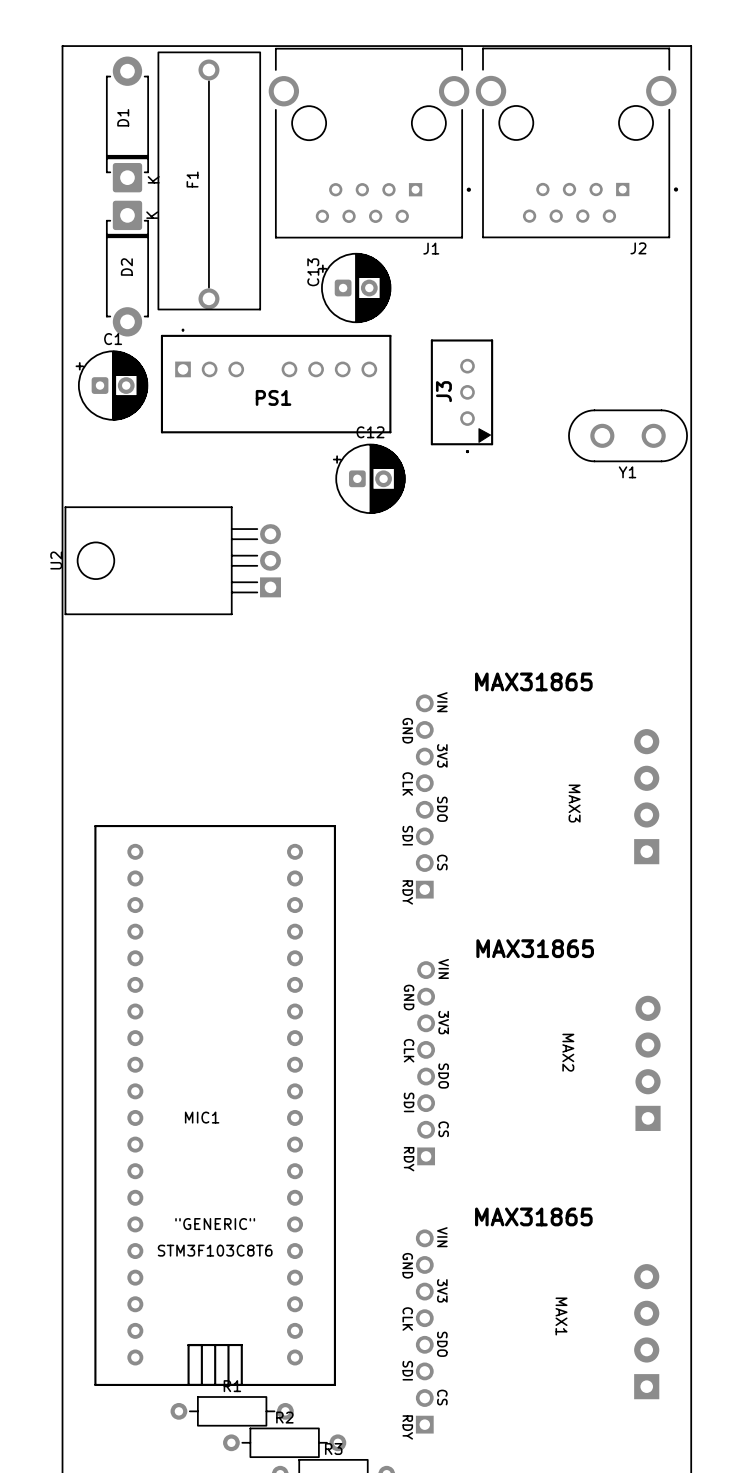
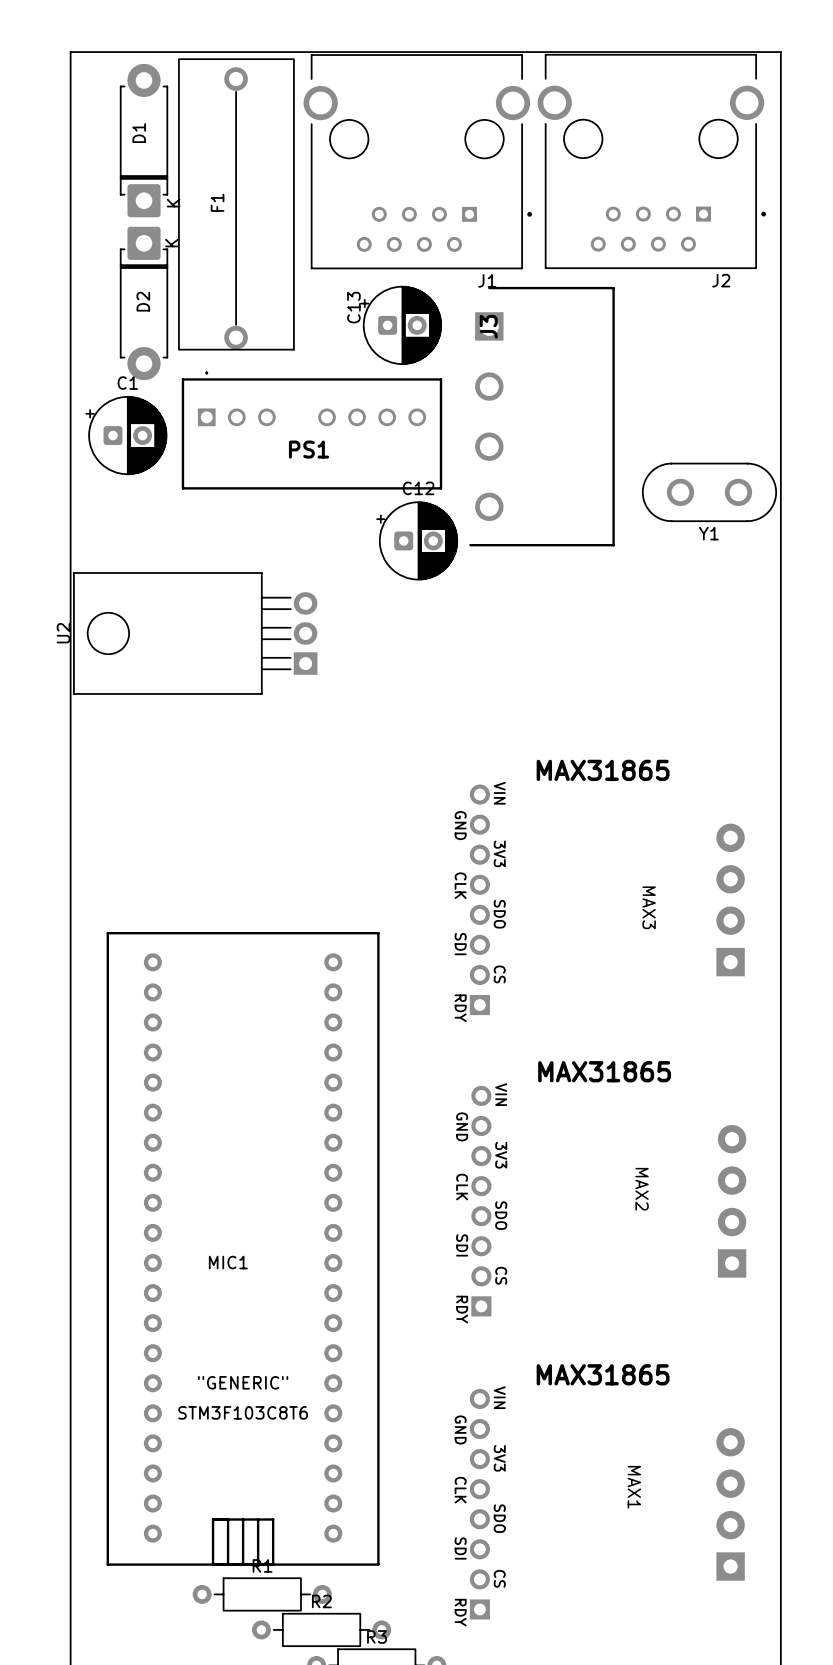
J3 footprint: [430, 339, 494, 454] -> [469, 286, 615, 547]
J3 name position: J3 (443, 391) -> J3 (488, 326)

